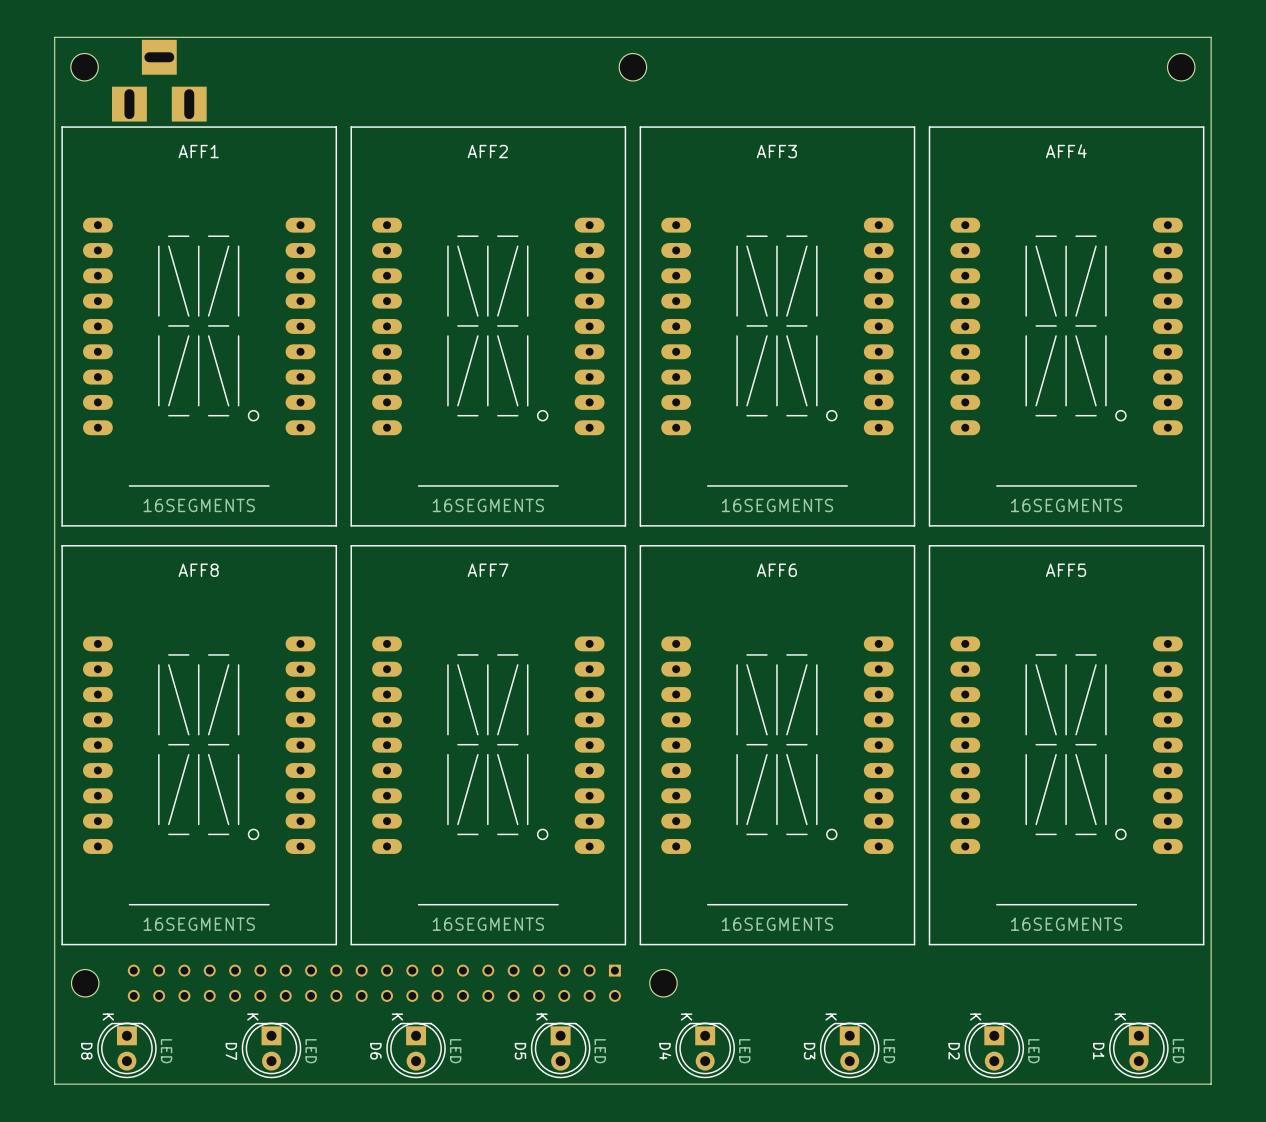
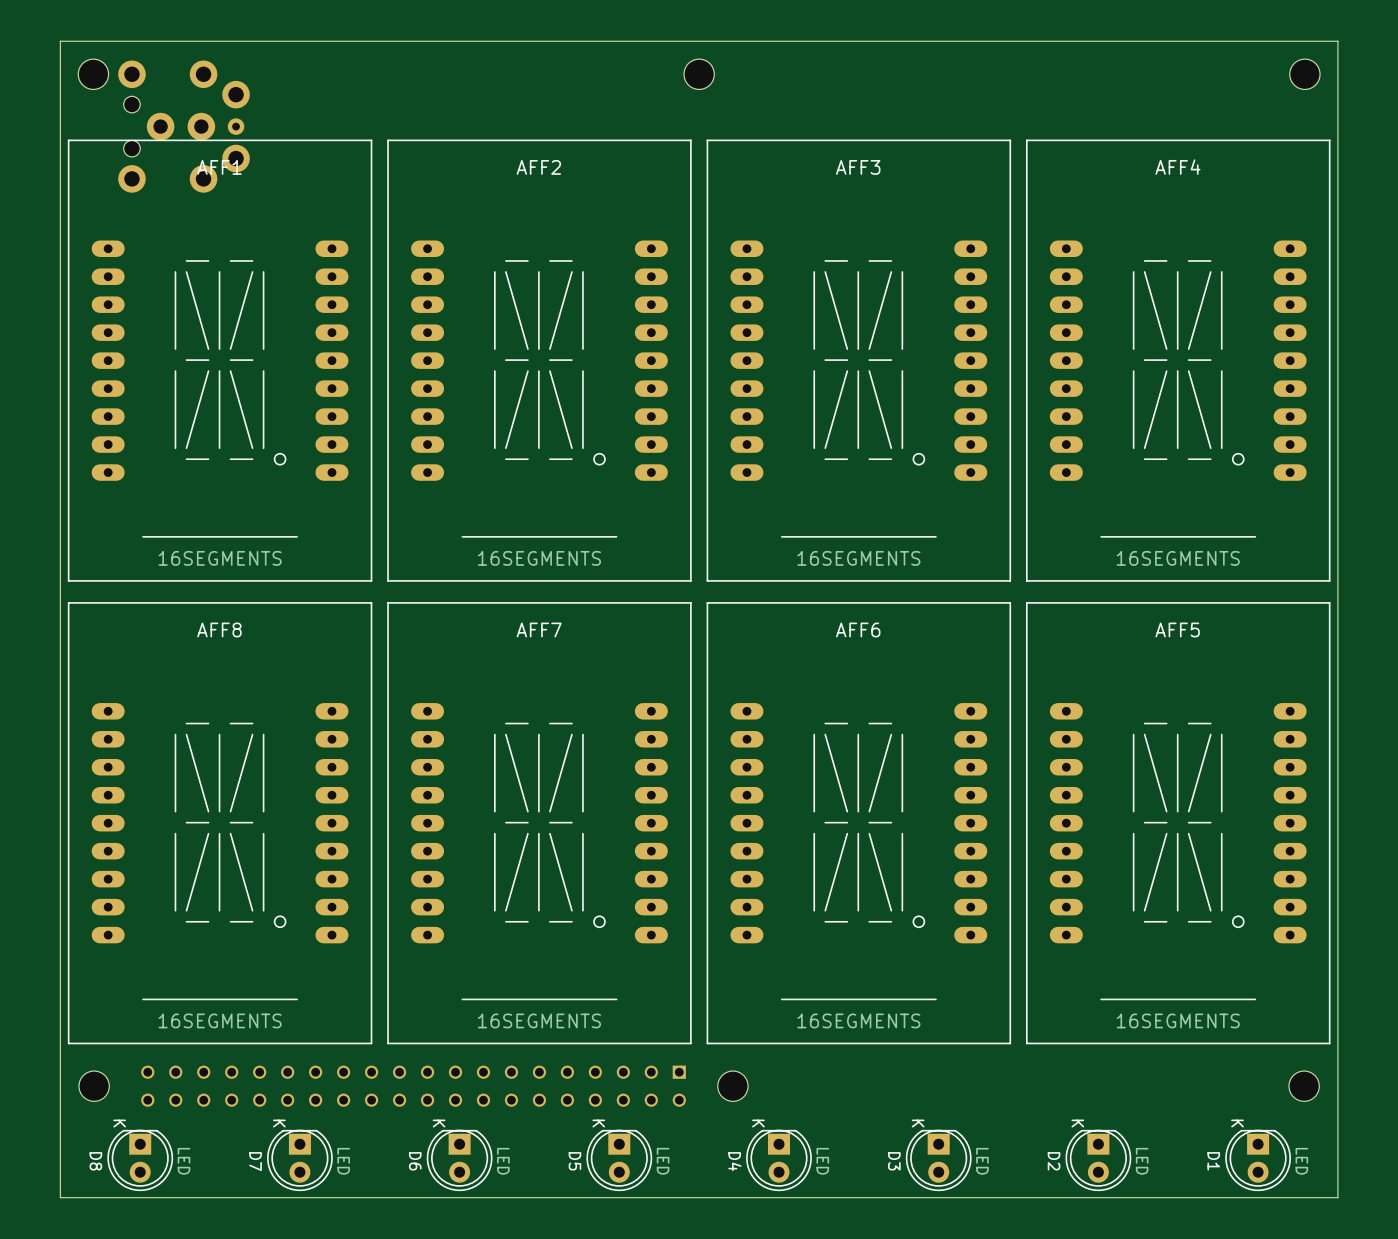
part: (159, 80) -> none
part: none -> (184, 126)
part: none -> (1304, 1086)

